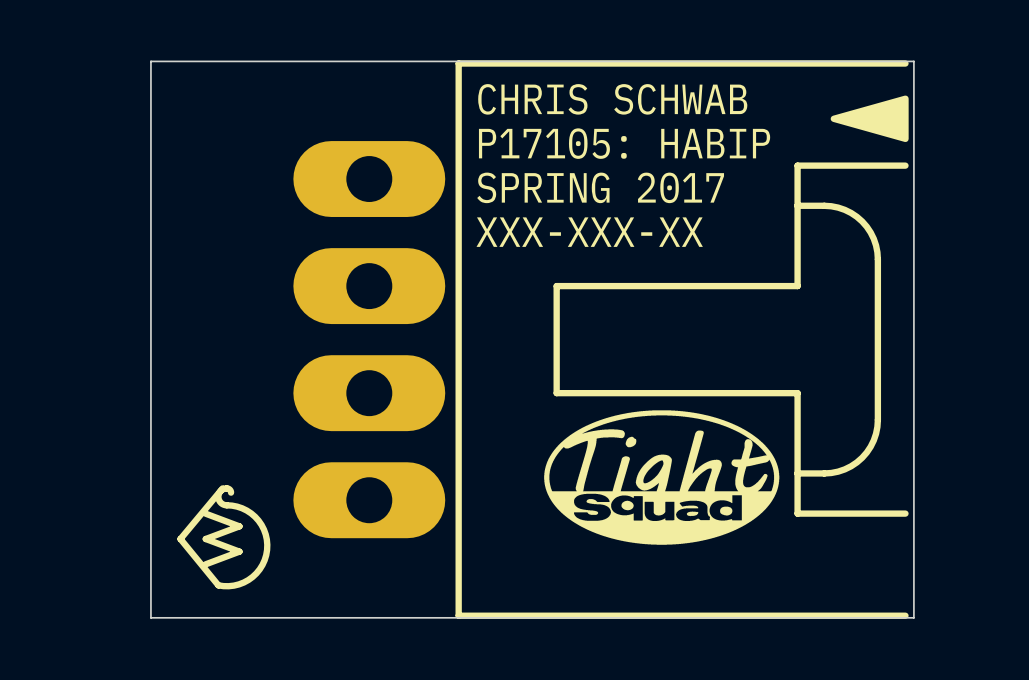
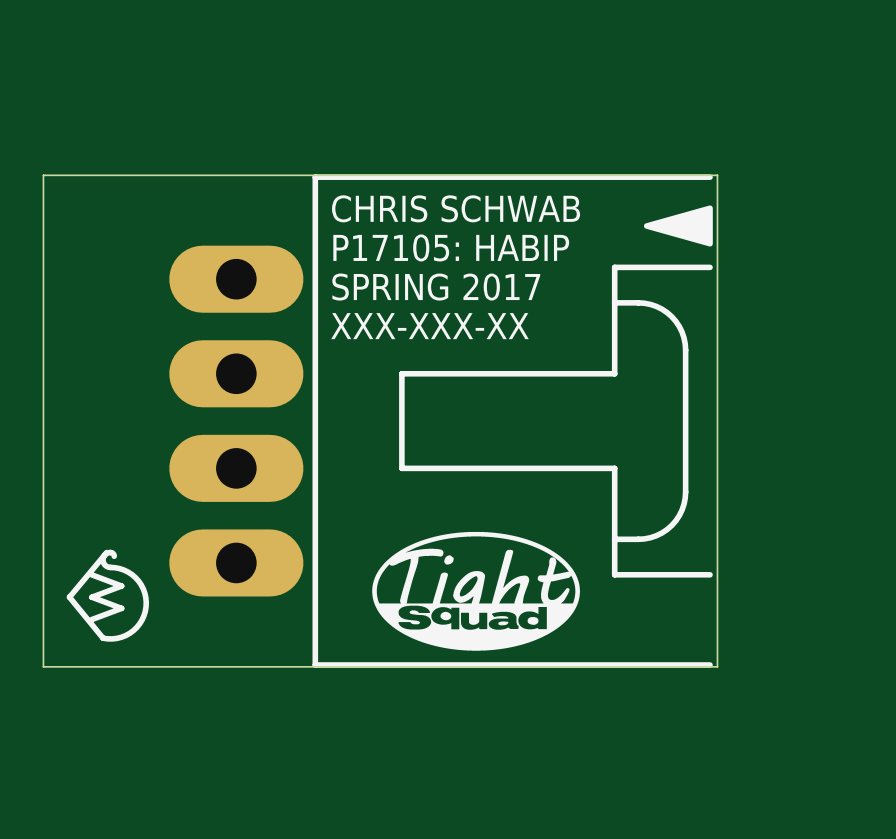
drawing position: (661, 477) -> (476, 591)

